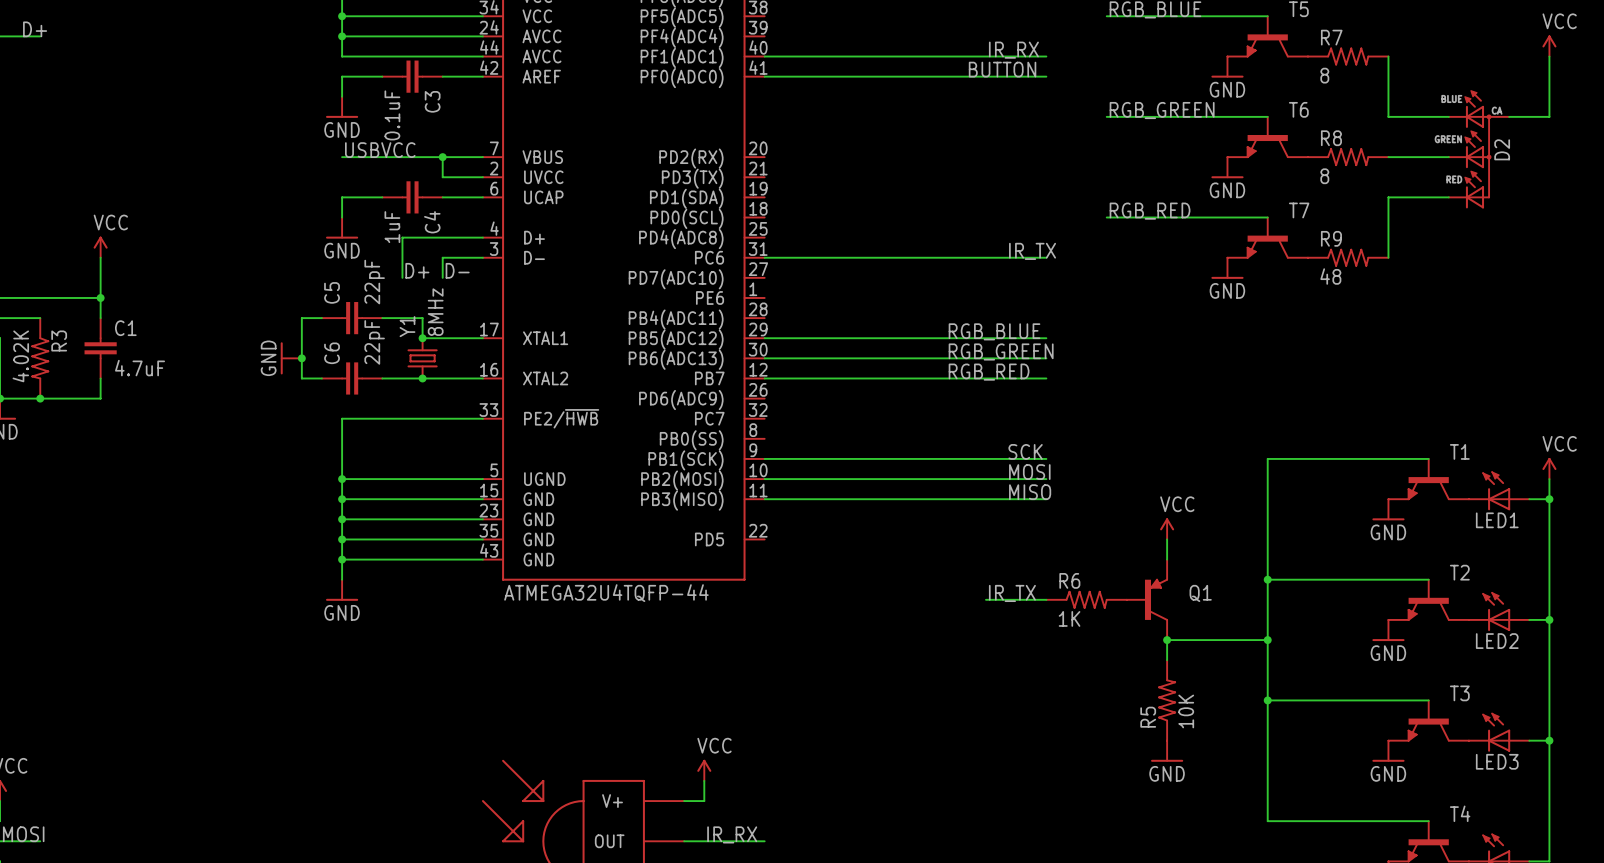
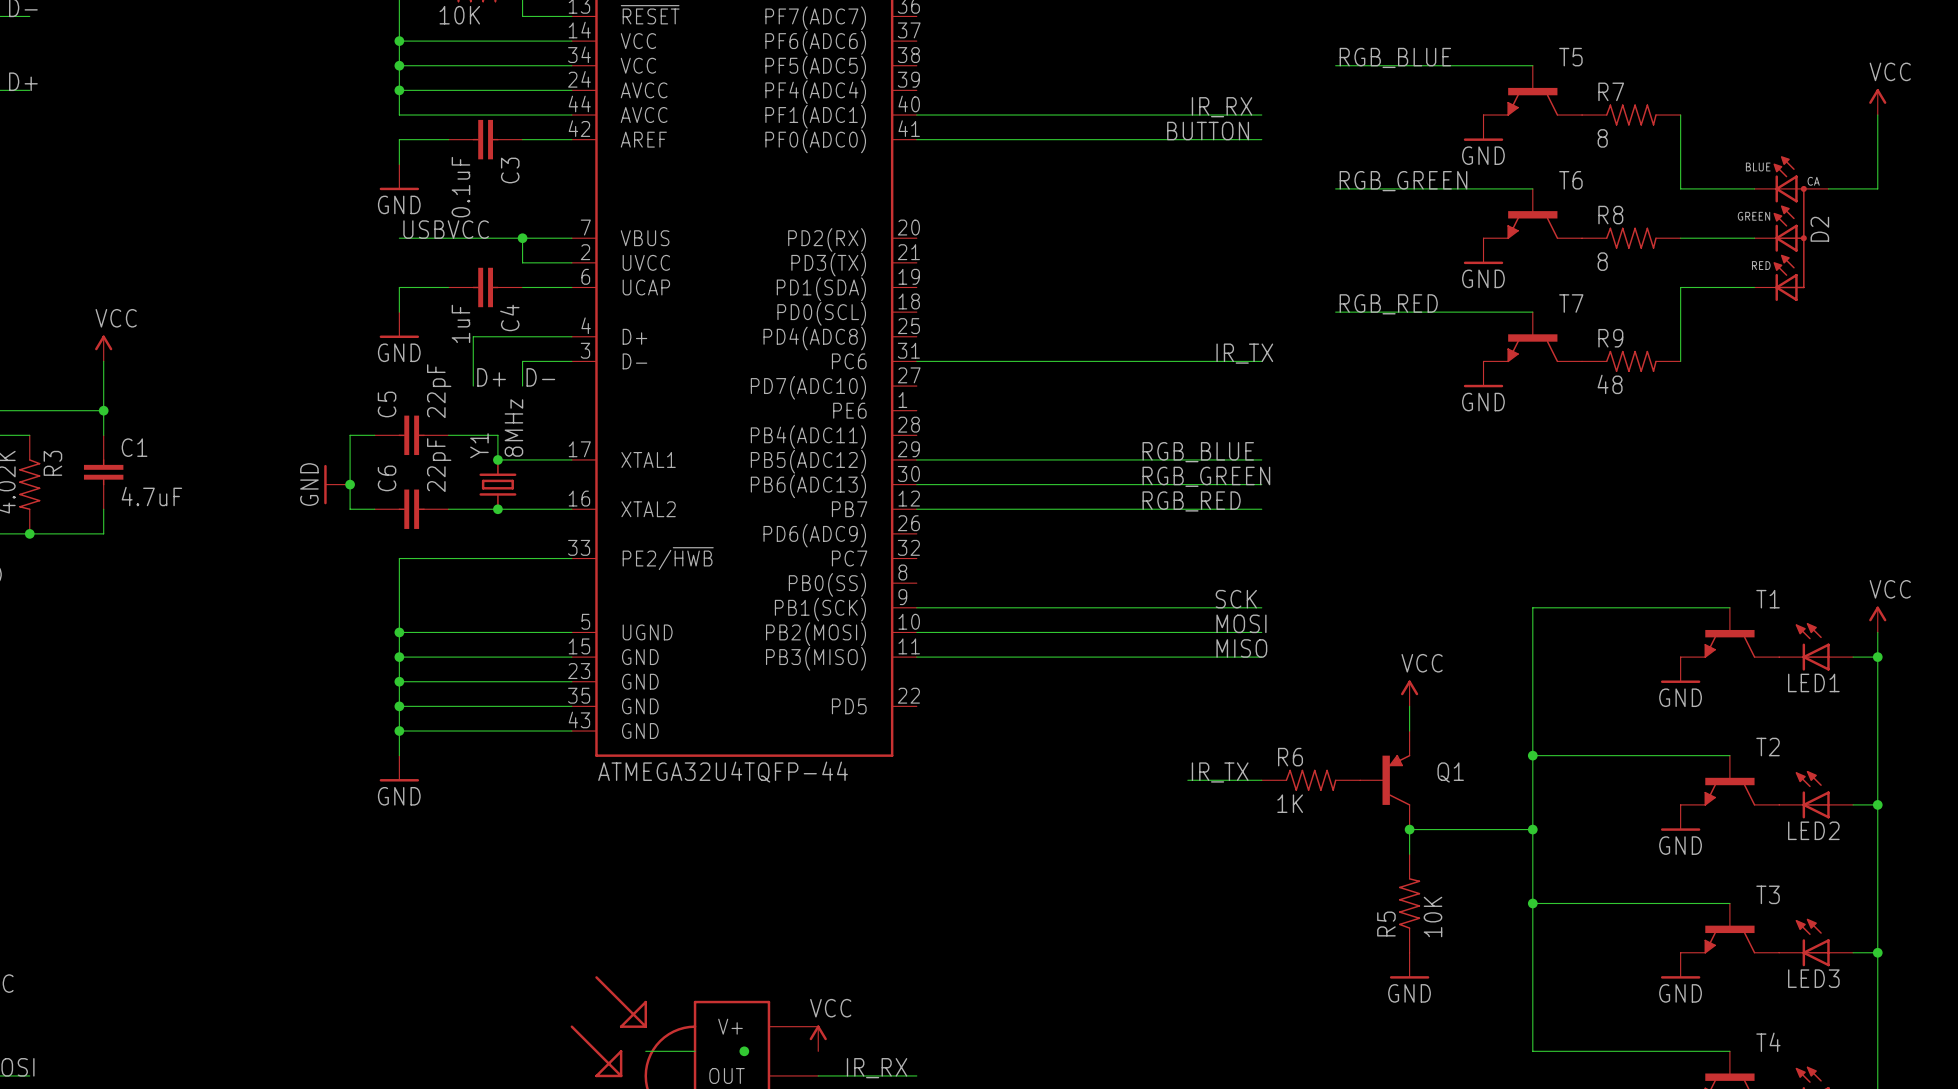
power symbol position: VCC (704, 770) -> VCC (818, 1038)
wire: (704, 780) (704, 801) (684, 801) -> none
wire: none -> (645, 1051) (695, 1051)
junction: none -> (744, 1051)

